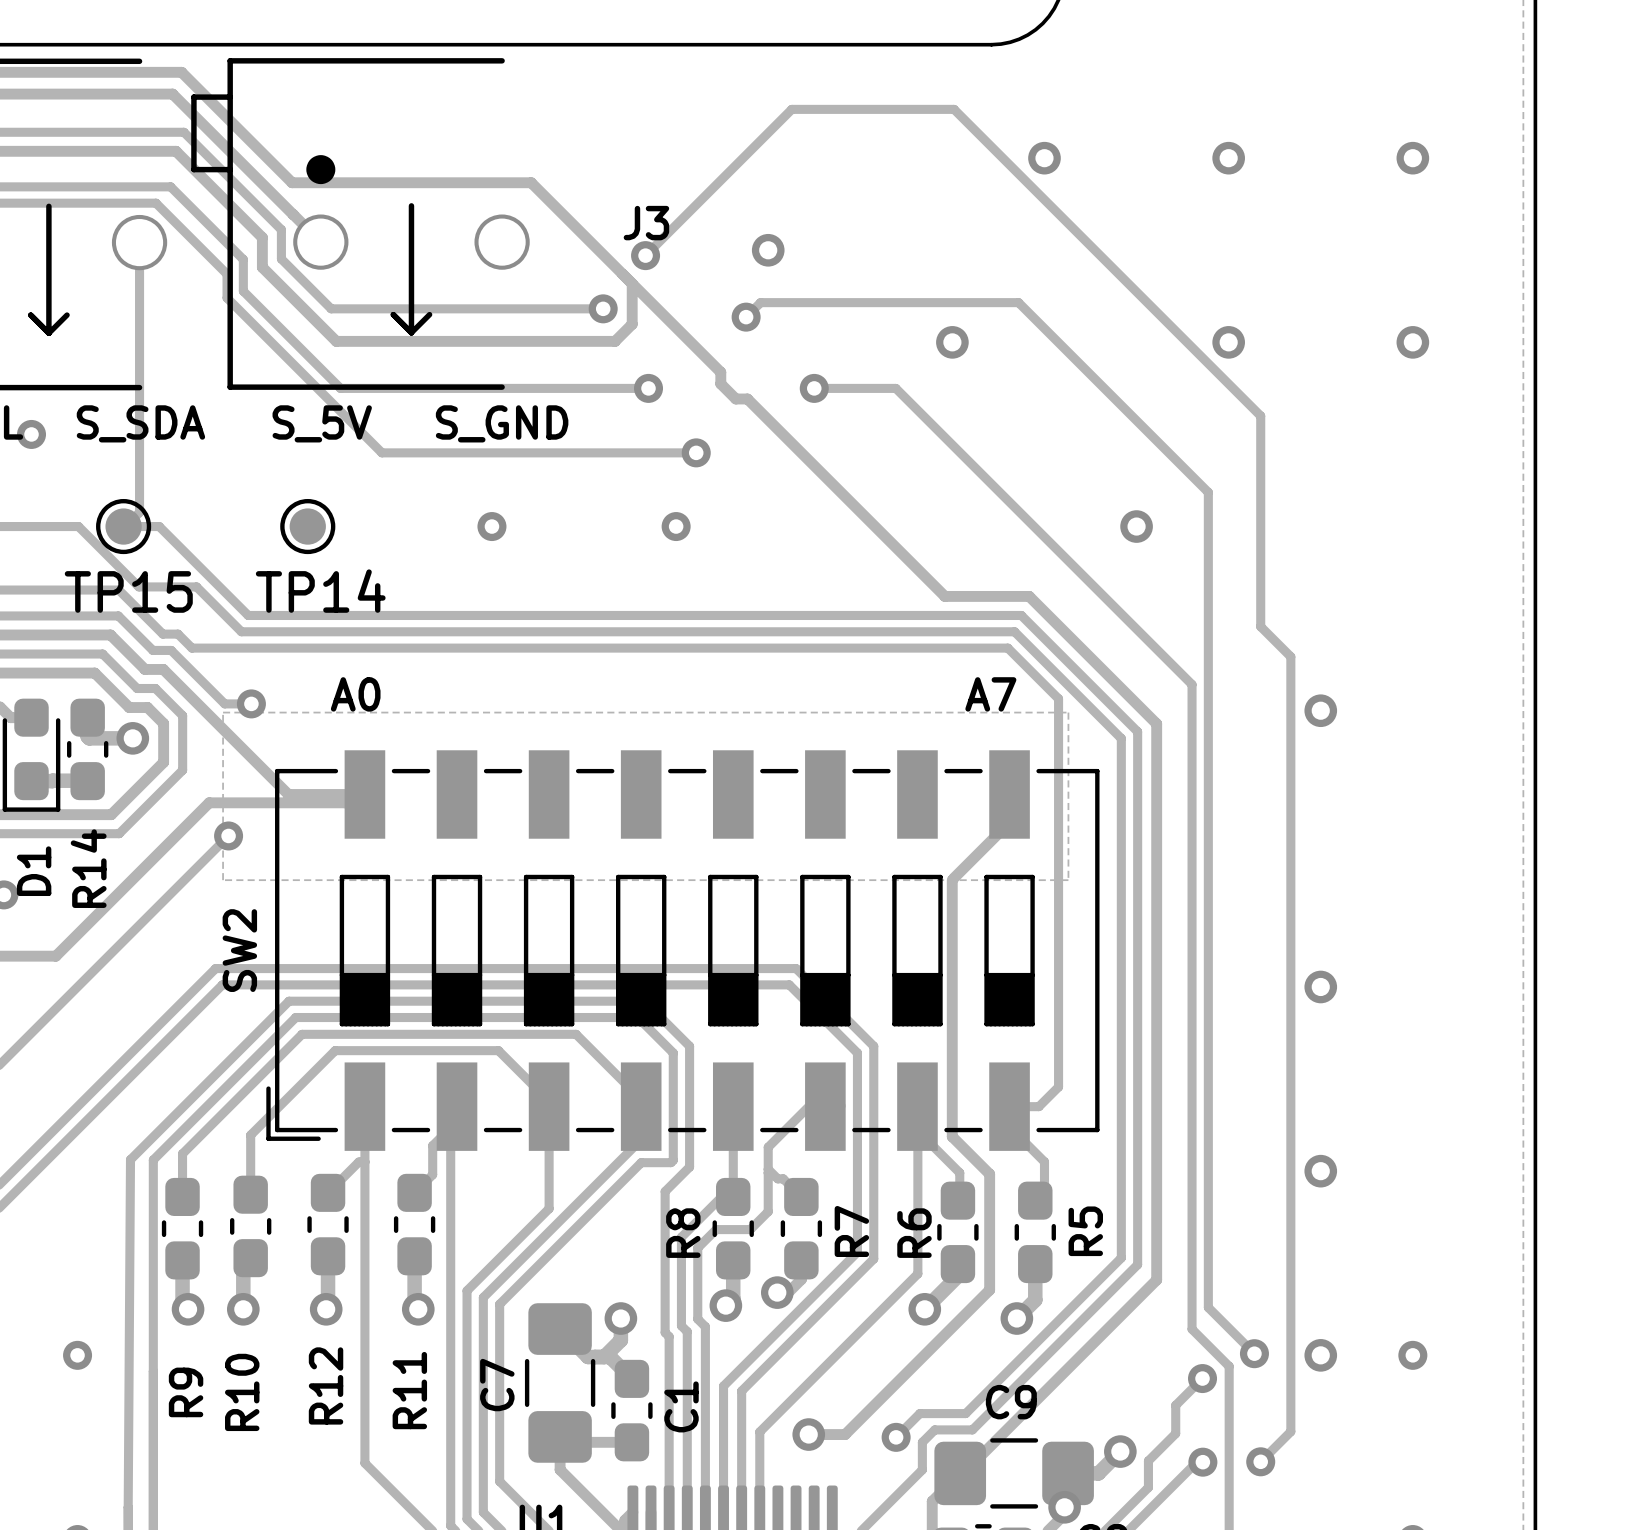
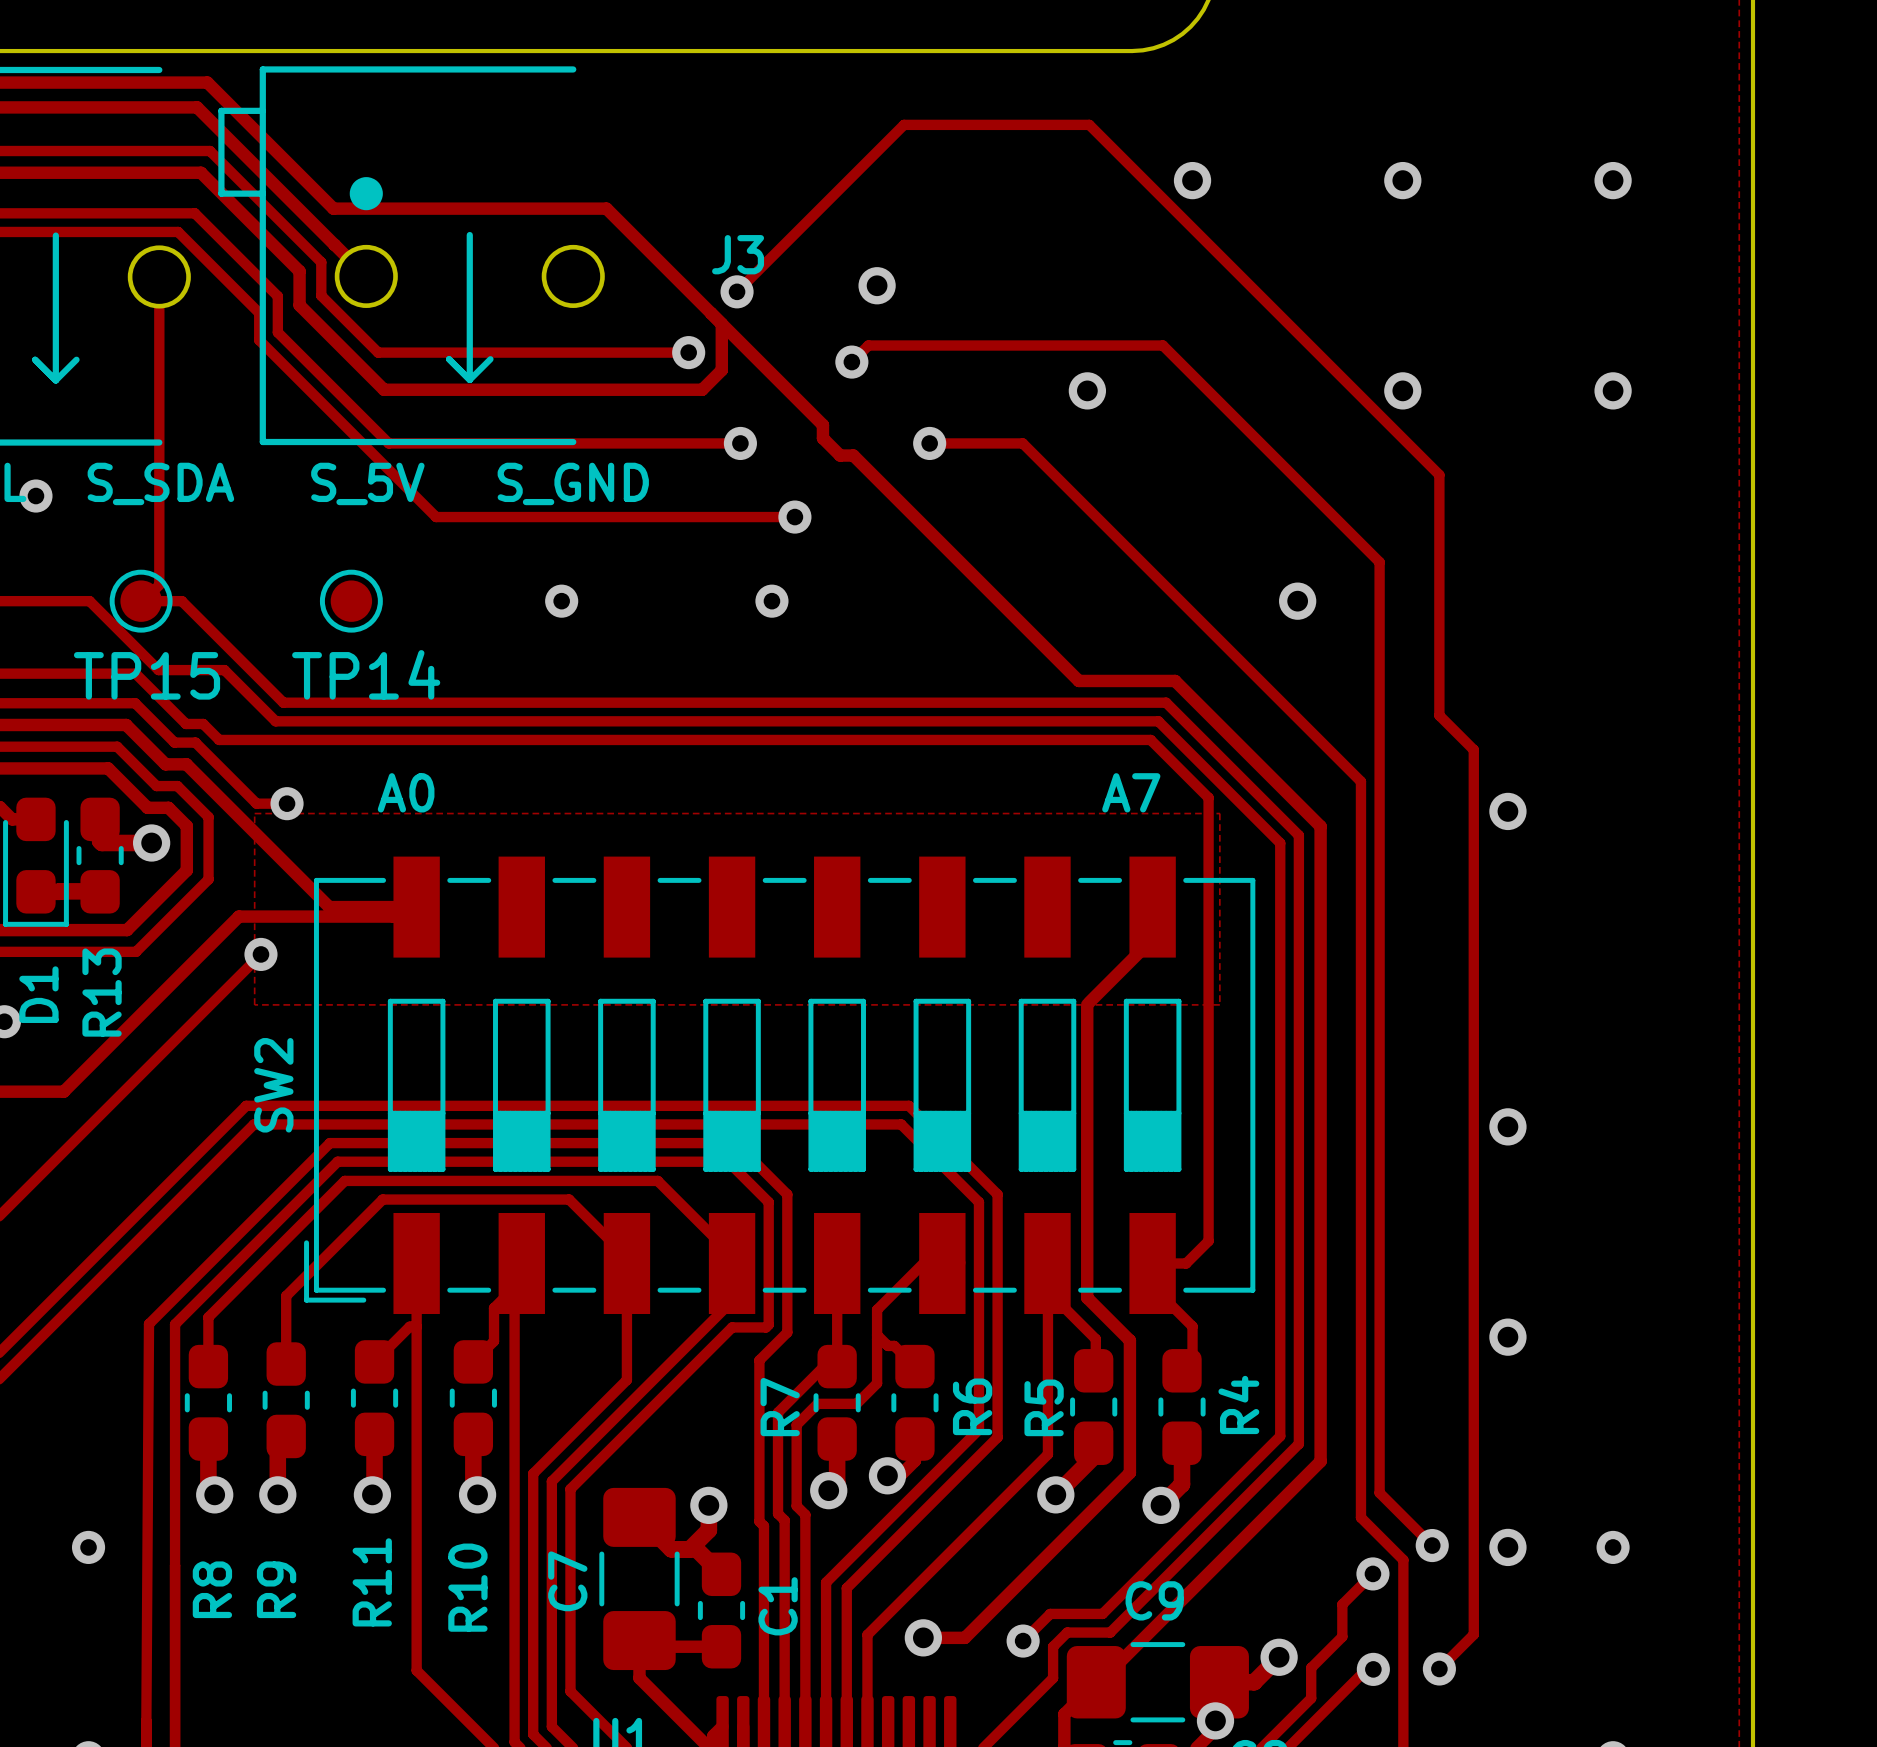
R14 name: R14 (88, 868) -> R13 (102, 992)
R7 name: R7 (851, 1231) -> R6 (972, 1406)
R5 name: R5 (1085, 1231) -> R4 (1238, 1404)
R8 name: R8 (683, 1233) -> R7 (780, 1407)
R6 name: R6 (914, 1233) -> R5 (1044, 1407)
R12 name: R12 (326, 1385) -> R11 (372, 1582)
R11 name: R11 (409, 1390) -> R10 (467, 1587)
R9 name: R9 (186, 1392) -> R8 (212, 1589)
R10 name: R10 (242, 1392) -> R9 (276, 1589)

